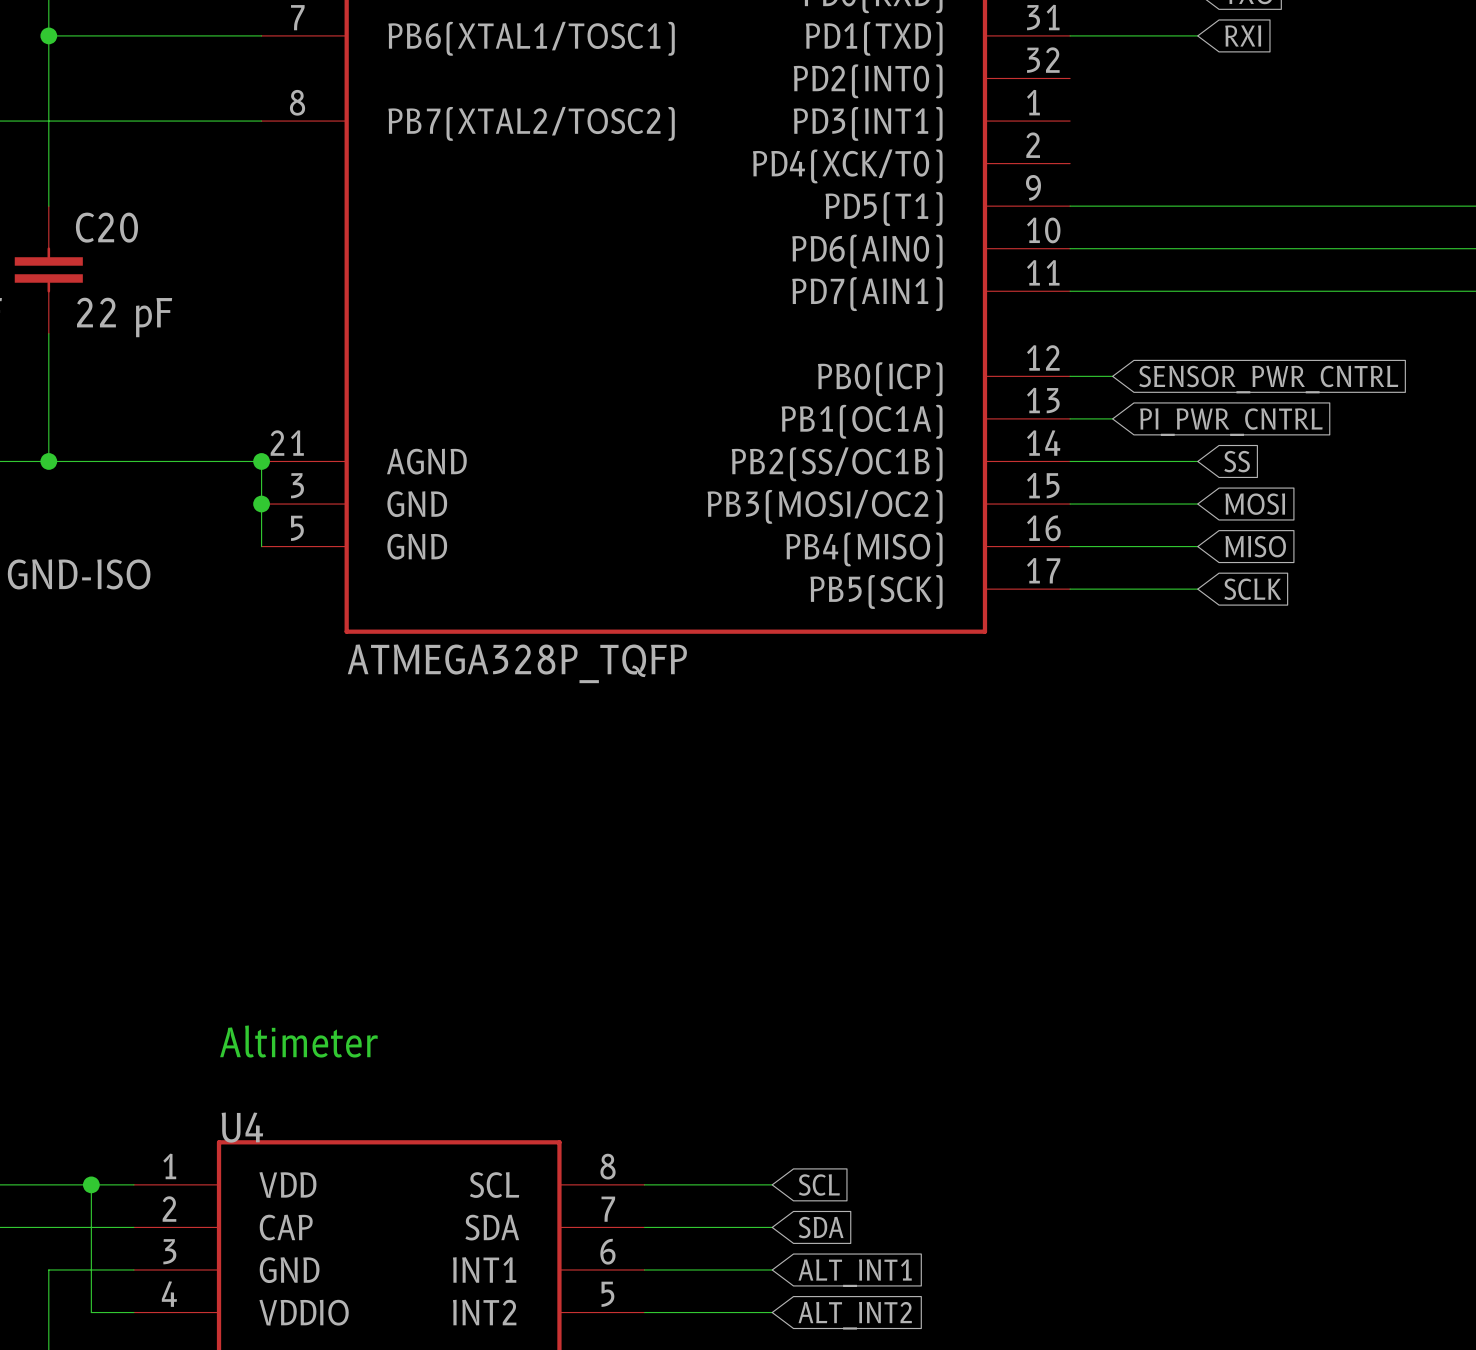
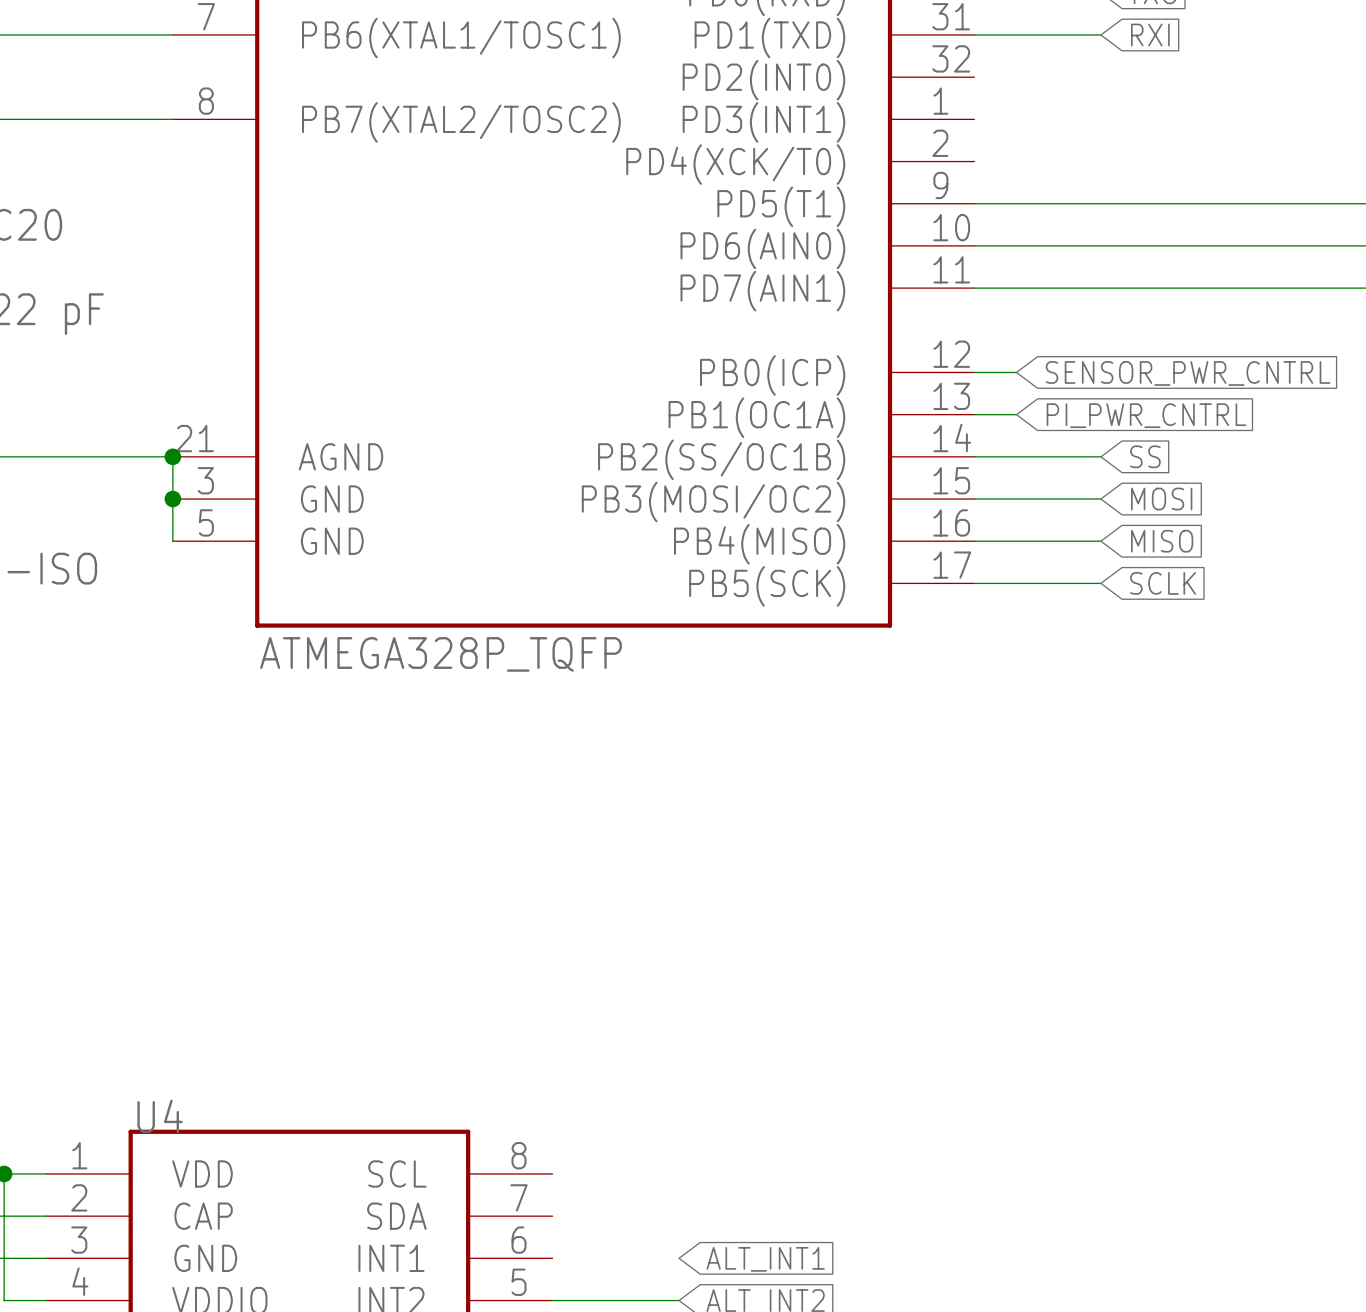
text: Altimeter (298, 1041) -> none
wire: (644, 1184) (772, 1184) -> none
global label: SCL (819, 1185) -> none
wire: (644, 1227) (772, 1227) -> none
global label: SDA (821, 1227) -> none
wire: (644, 1269) (772, 1269) -> none

